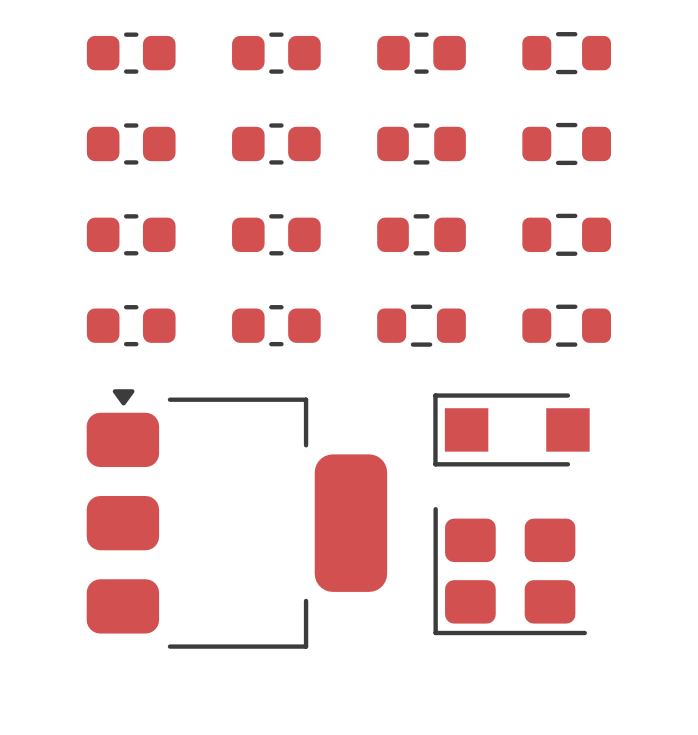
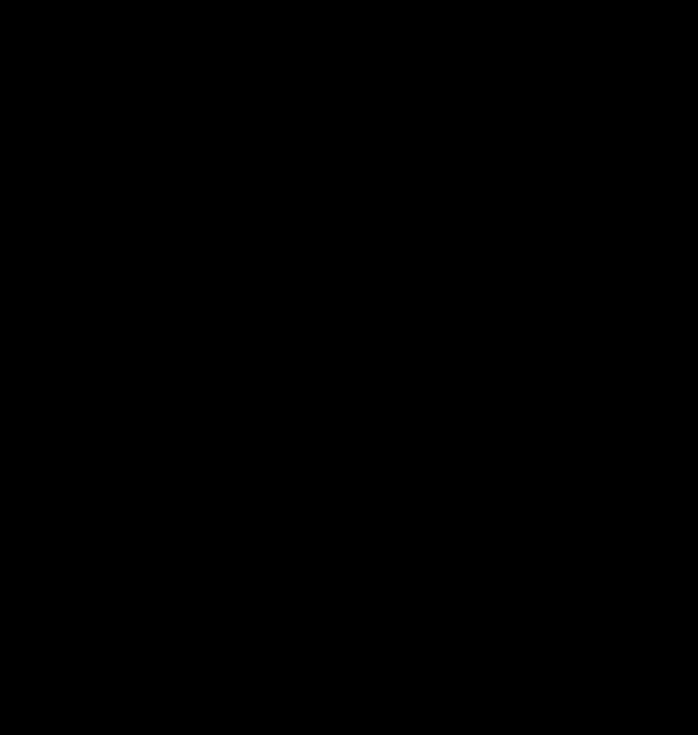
part: (131, 53) -> none
part: (276, 53) -> none
part: (421, 53) -> none
part: (566, 53) -> none
part: (131, 143) -> none
part: (276, 143) -> none
part: (421, 143) -> none
part: (566, 143) -> none
part: (131, 234) -> none
part: (276, 234) -> none
part: (421, 234) -> none
part: (566, 234) -> none
part: (131, 325) -> none
part: (276, 325) -> none
part: (421, 325) -> none
part: (566, 325) -> none
part: (511, 429) -> none
part: (236, 518) -> none
part: (510, 571) -> none

